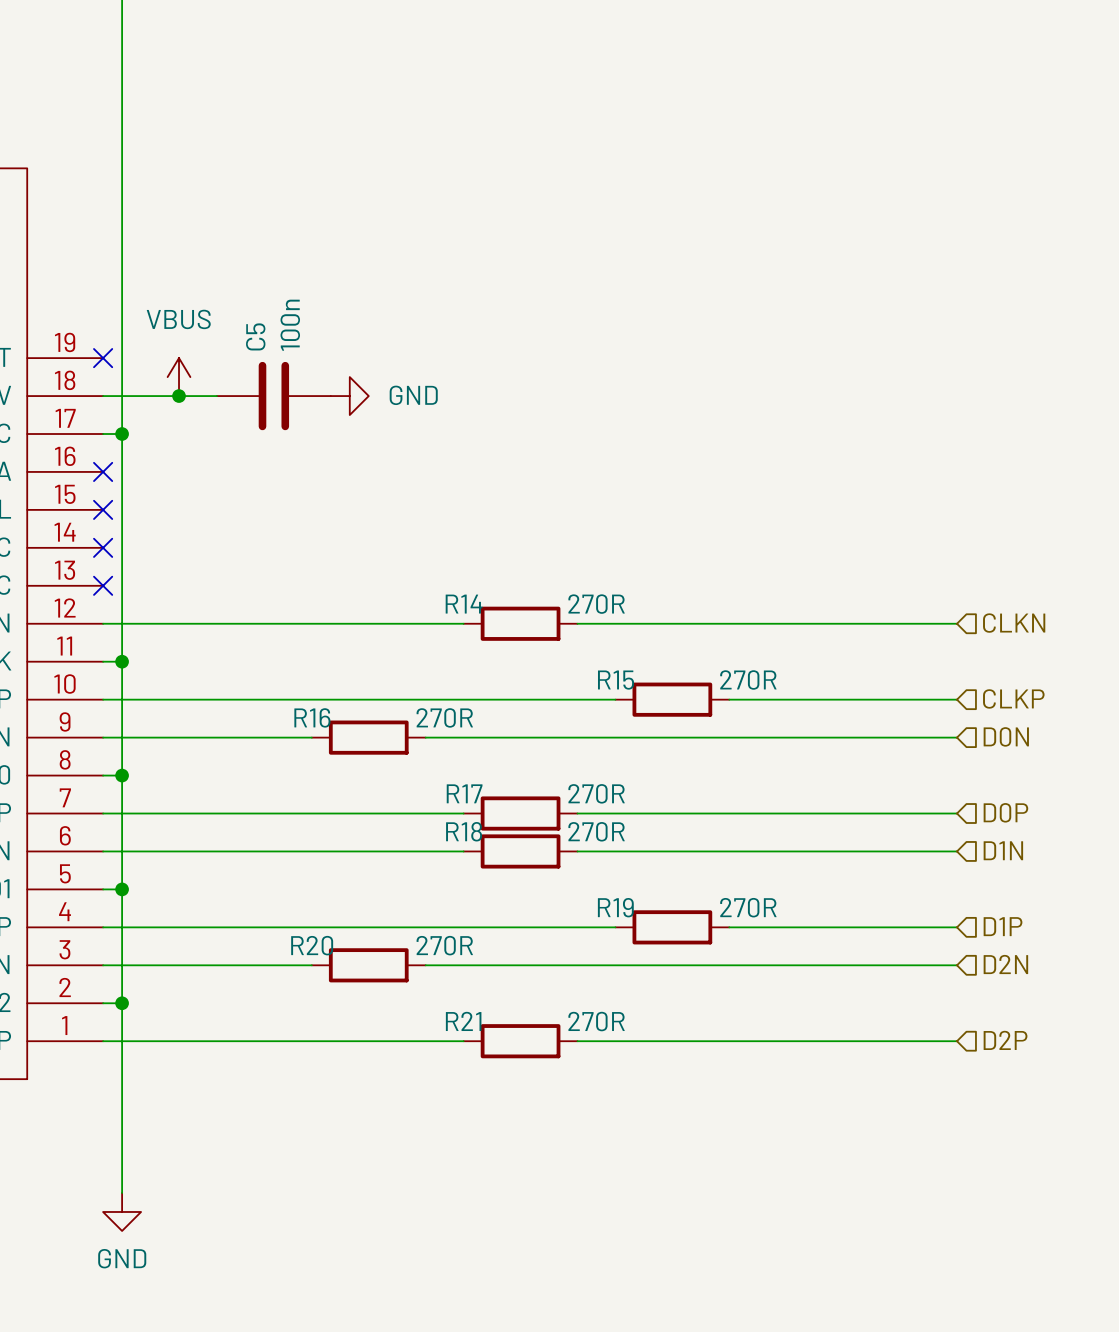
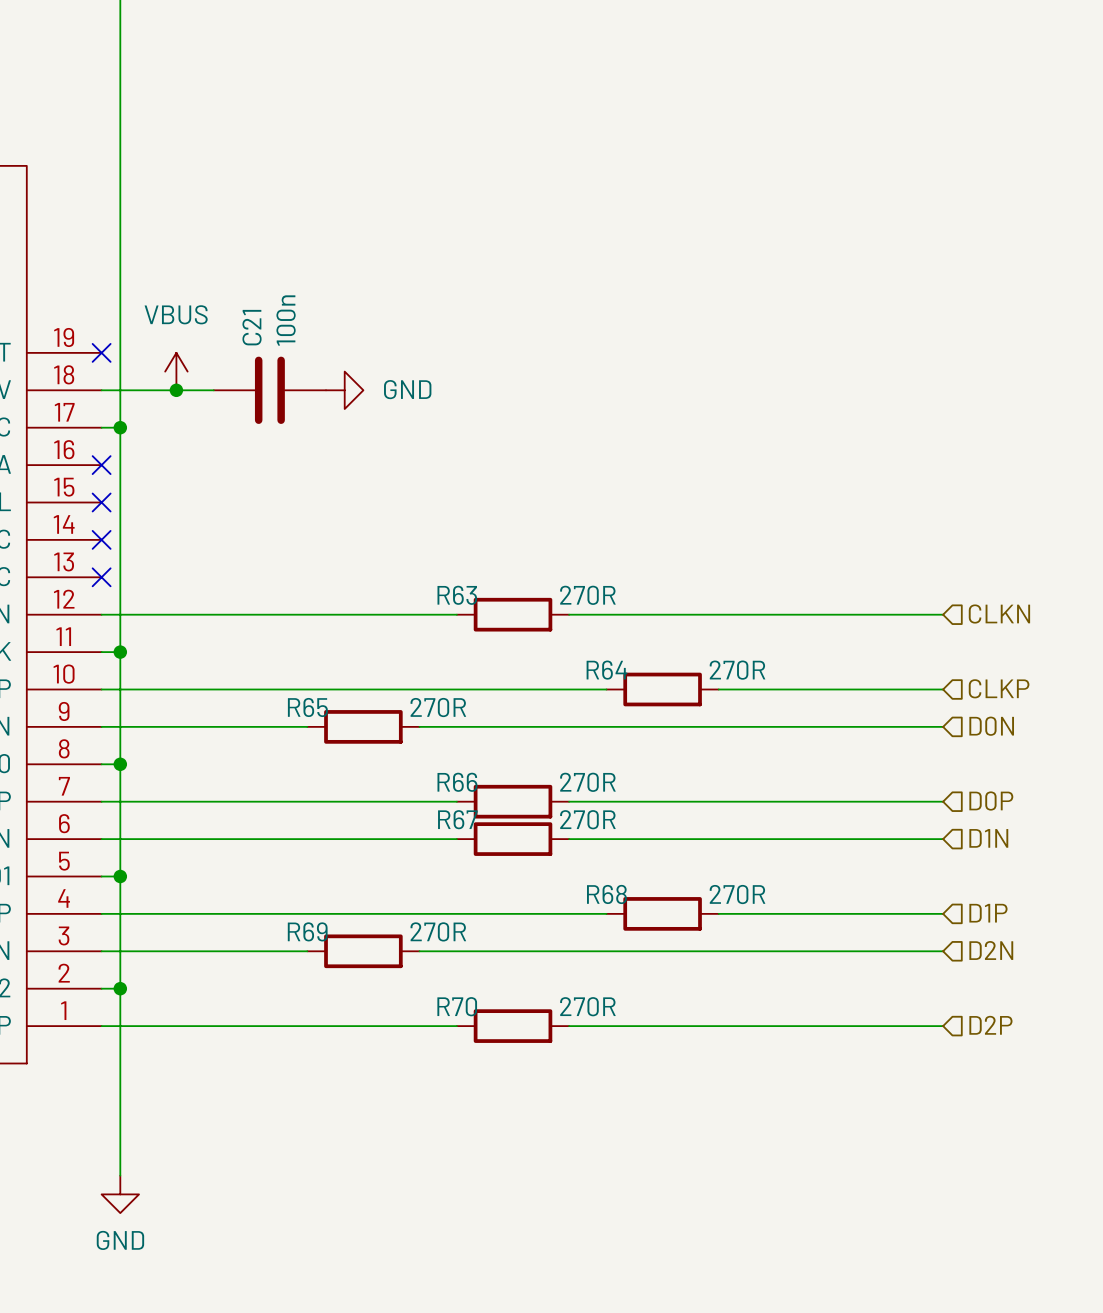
C5 name: C5 (255, 336) -> C21 (252, 327)
R14 name: R14 (464, 604) -> R63 (457, 595)
R15 name: R15 (616, 680) -> R64 (606, 670)
R16 name: R16 (312, 717) -> R65 (307, 707)
R17 name: R17 (464, 793) -> R66 (457, 782)
R18 name: R18 (464, 831) -> R67 (457, 819)
R19 name: R19 (615, 907) -> R68 (606, 894)
R20 name: R20 (312, 945) -> R69 (307, 931)
R21 name: R21 (463, 1021) -> R70 (457, 1006)

